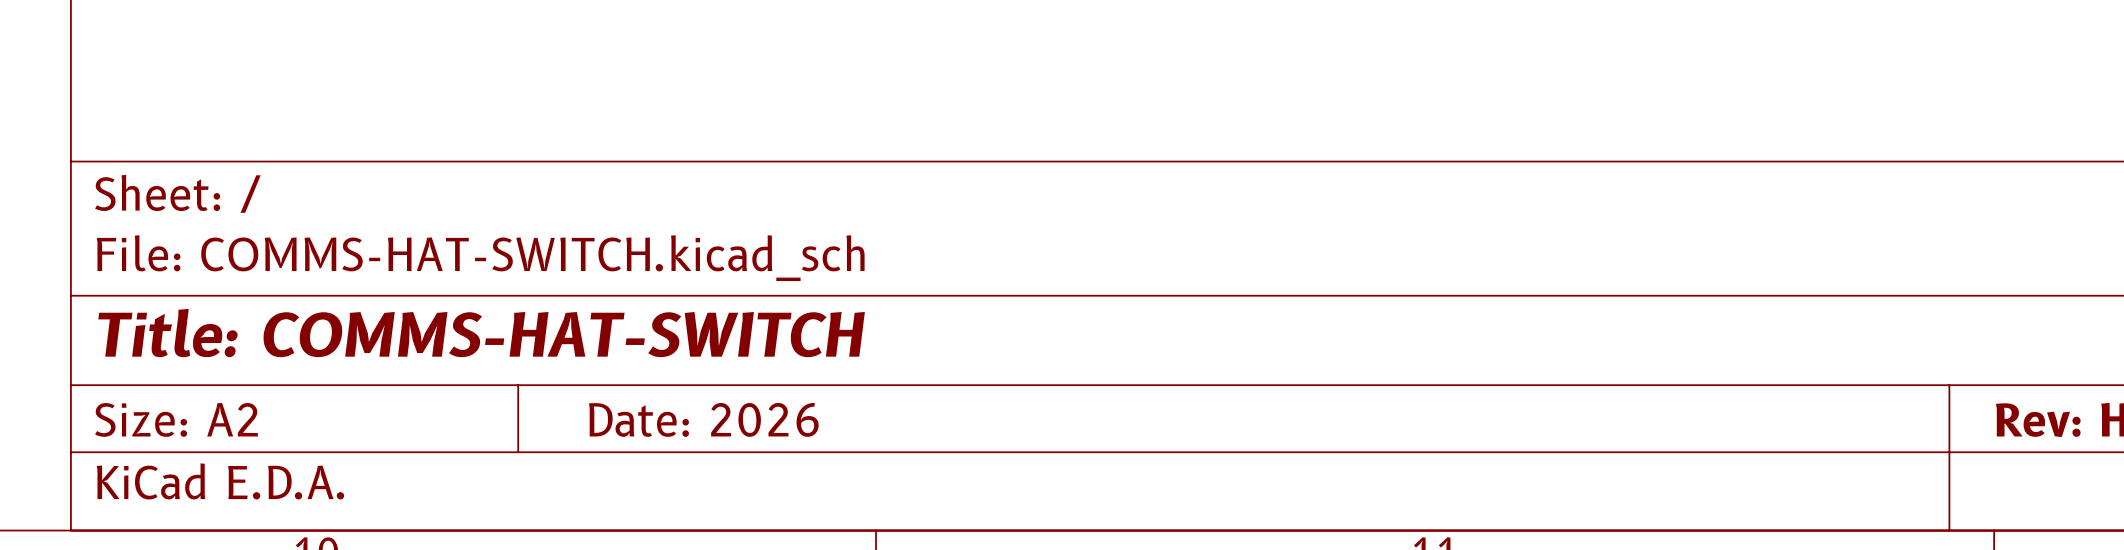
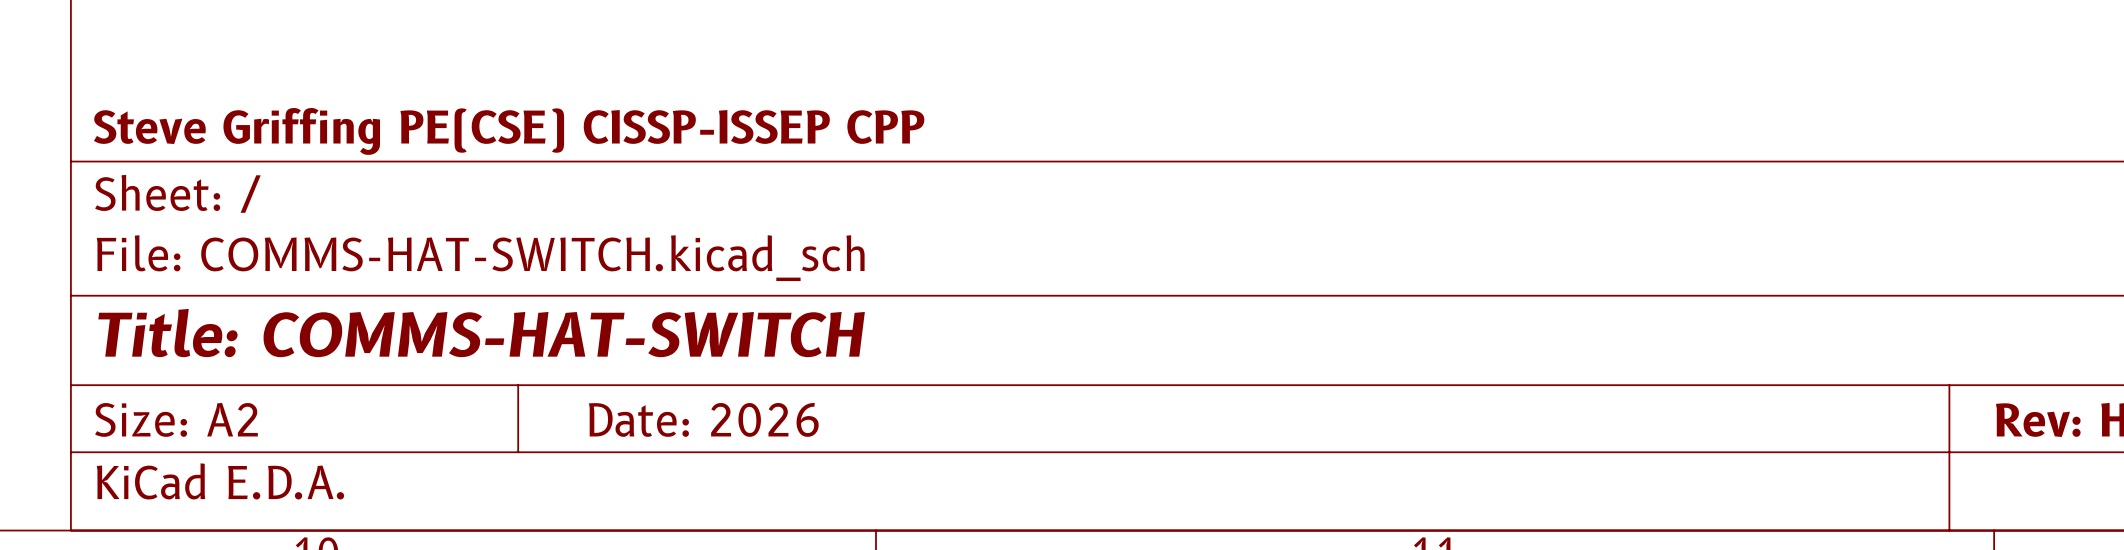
title block: none -> Steve Griffing PE(CSE) CISSP-ISSEP CPP (509, 131)

